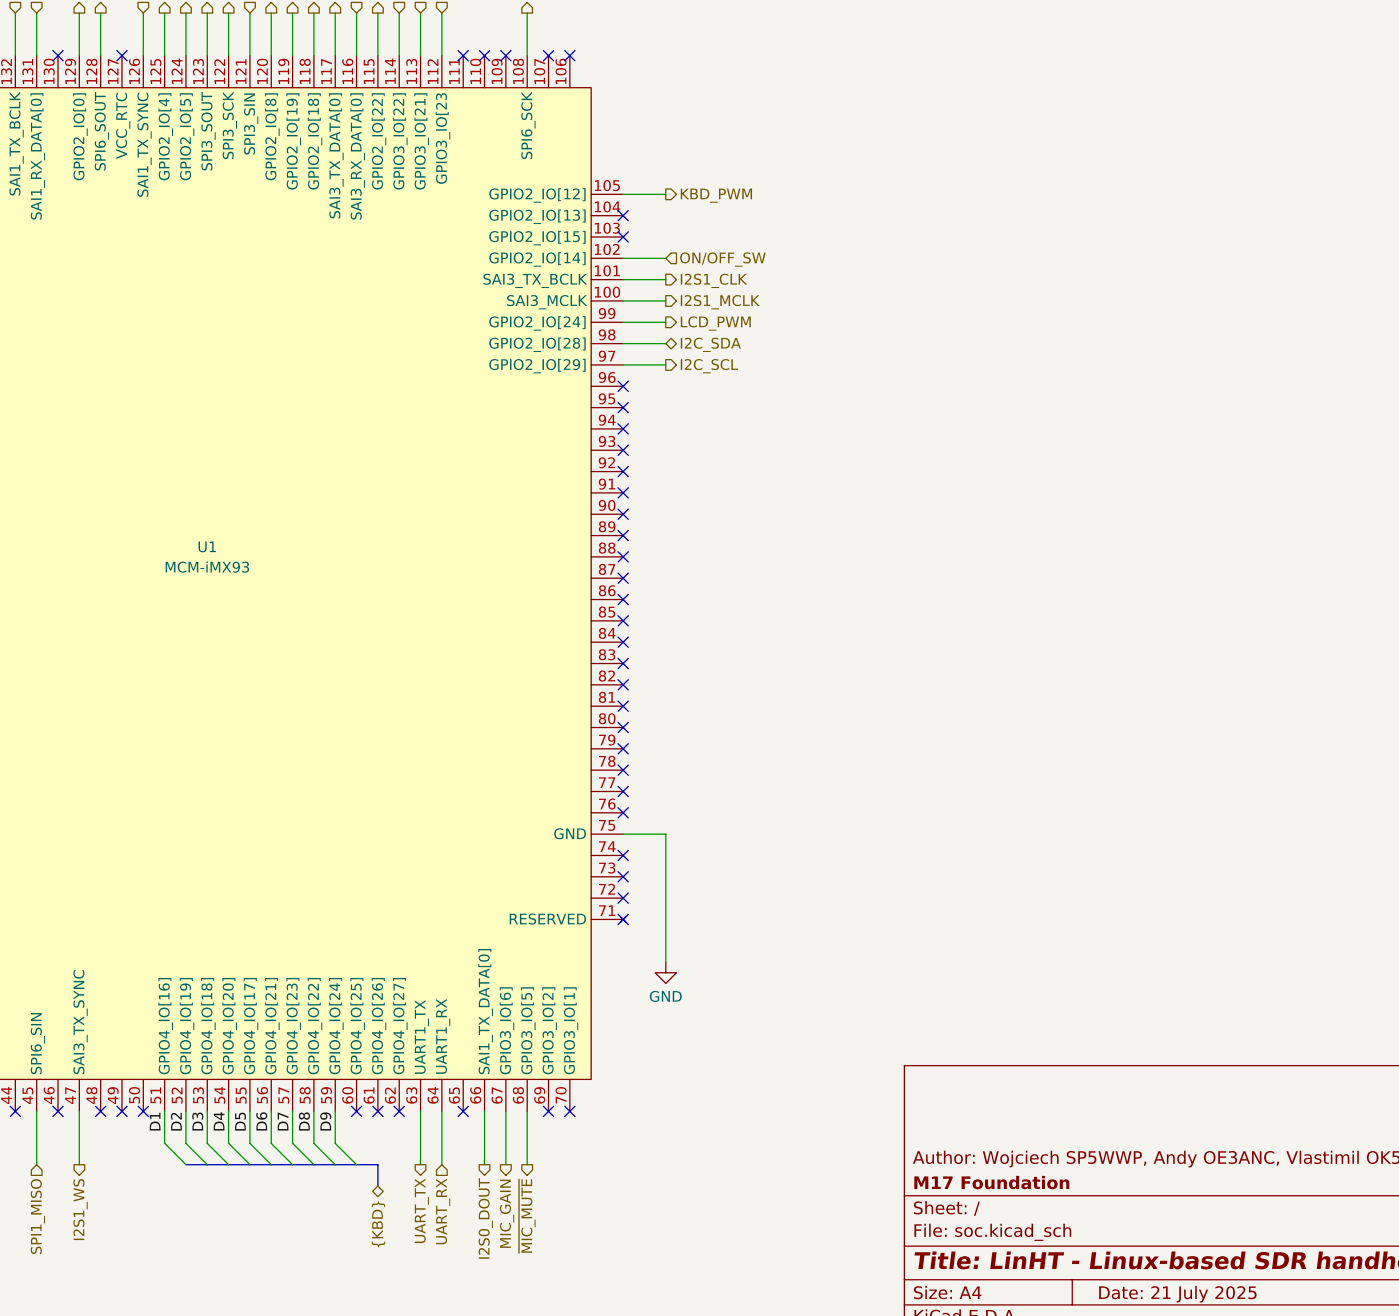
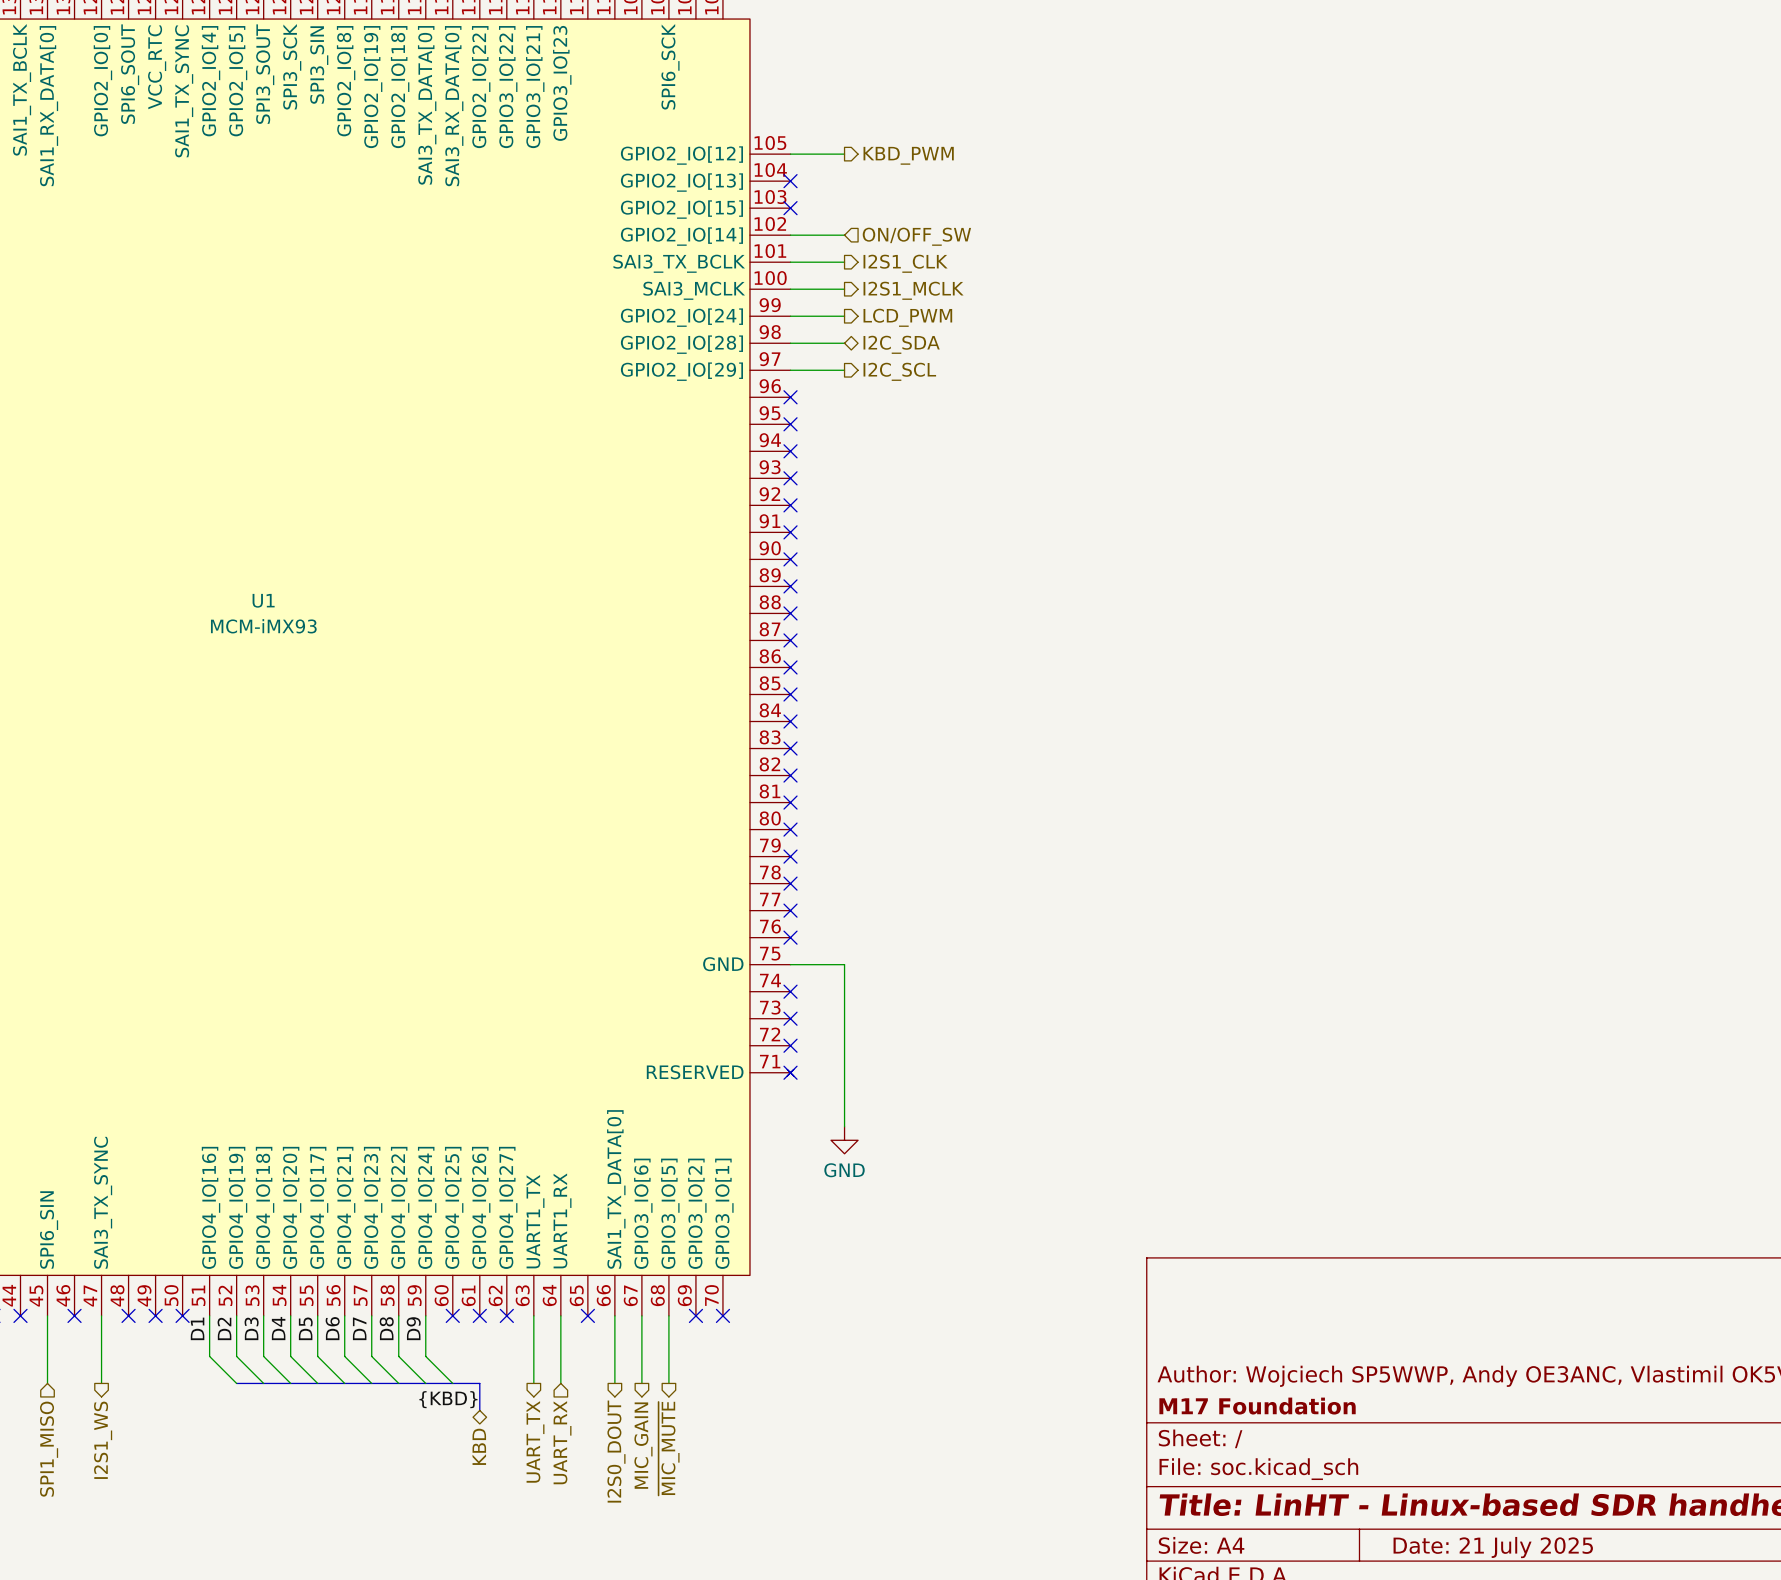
label: none -> {KBD} (448, 1399)
hierarchical label: {KBD} (378, 1224) -> KBD (479, 1446)

